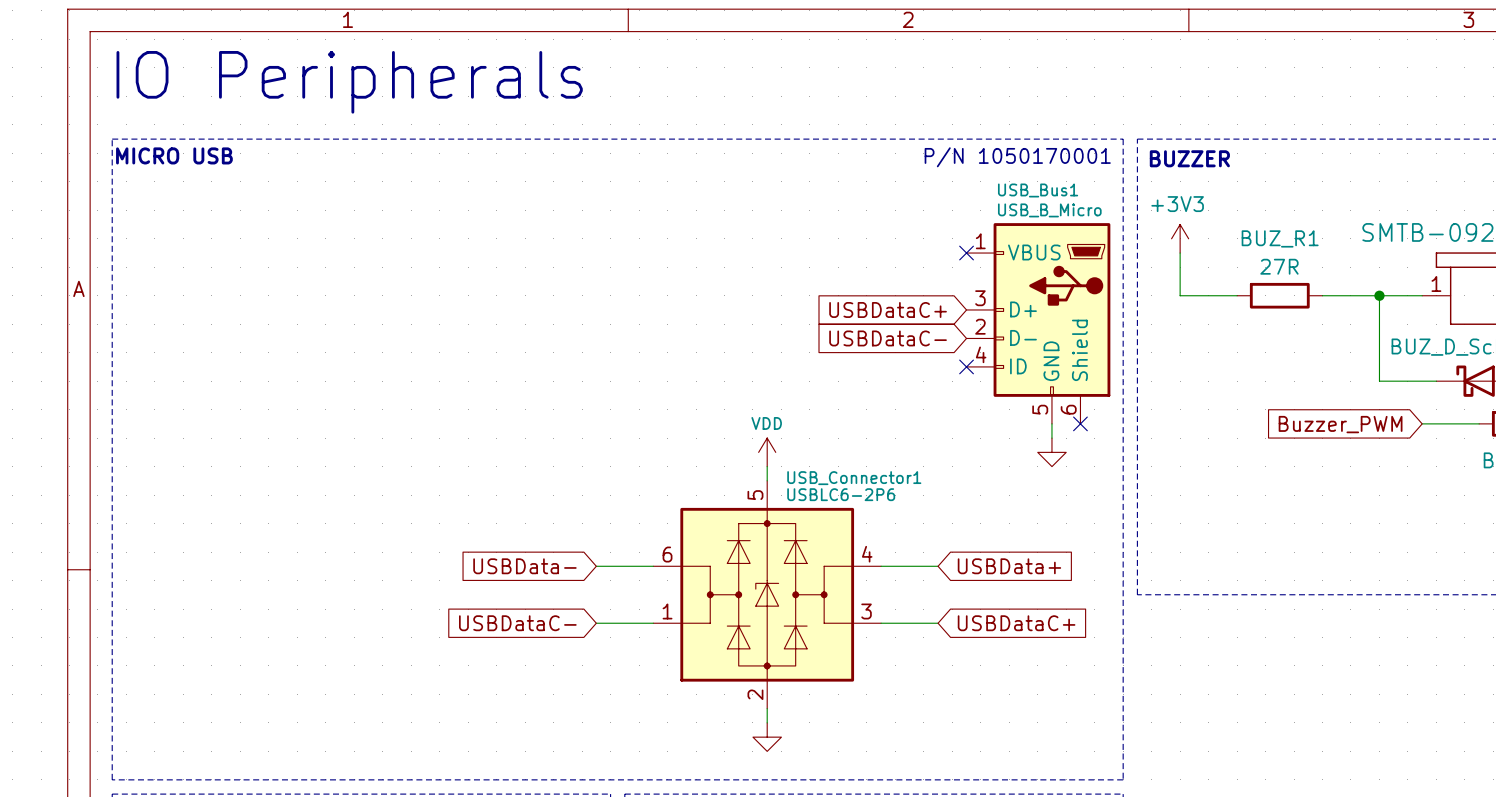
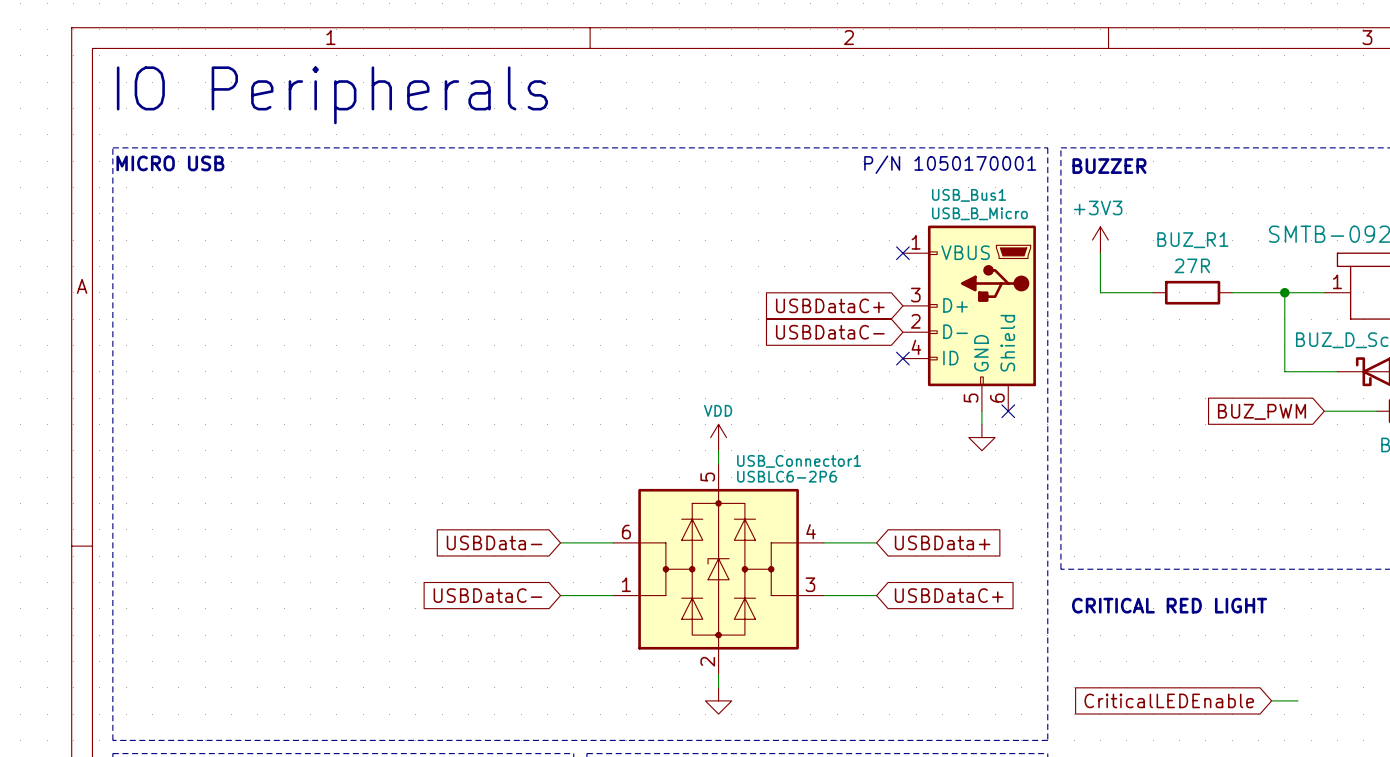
global label: Buzzer_PWM (1340, 424) -> BUZ_PWM (1261, 411)
text: none -> CRITICAL RED LIGHT (1169, 605)
global label: none -> CriticalLEDEnable (1169, 700)
wire: none -> (1271, 700) (1297, 700)

